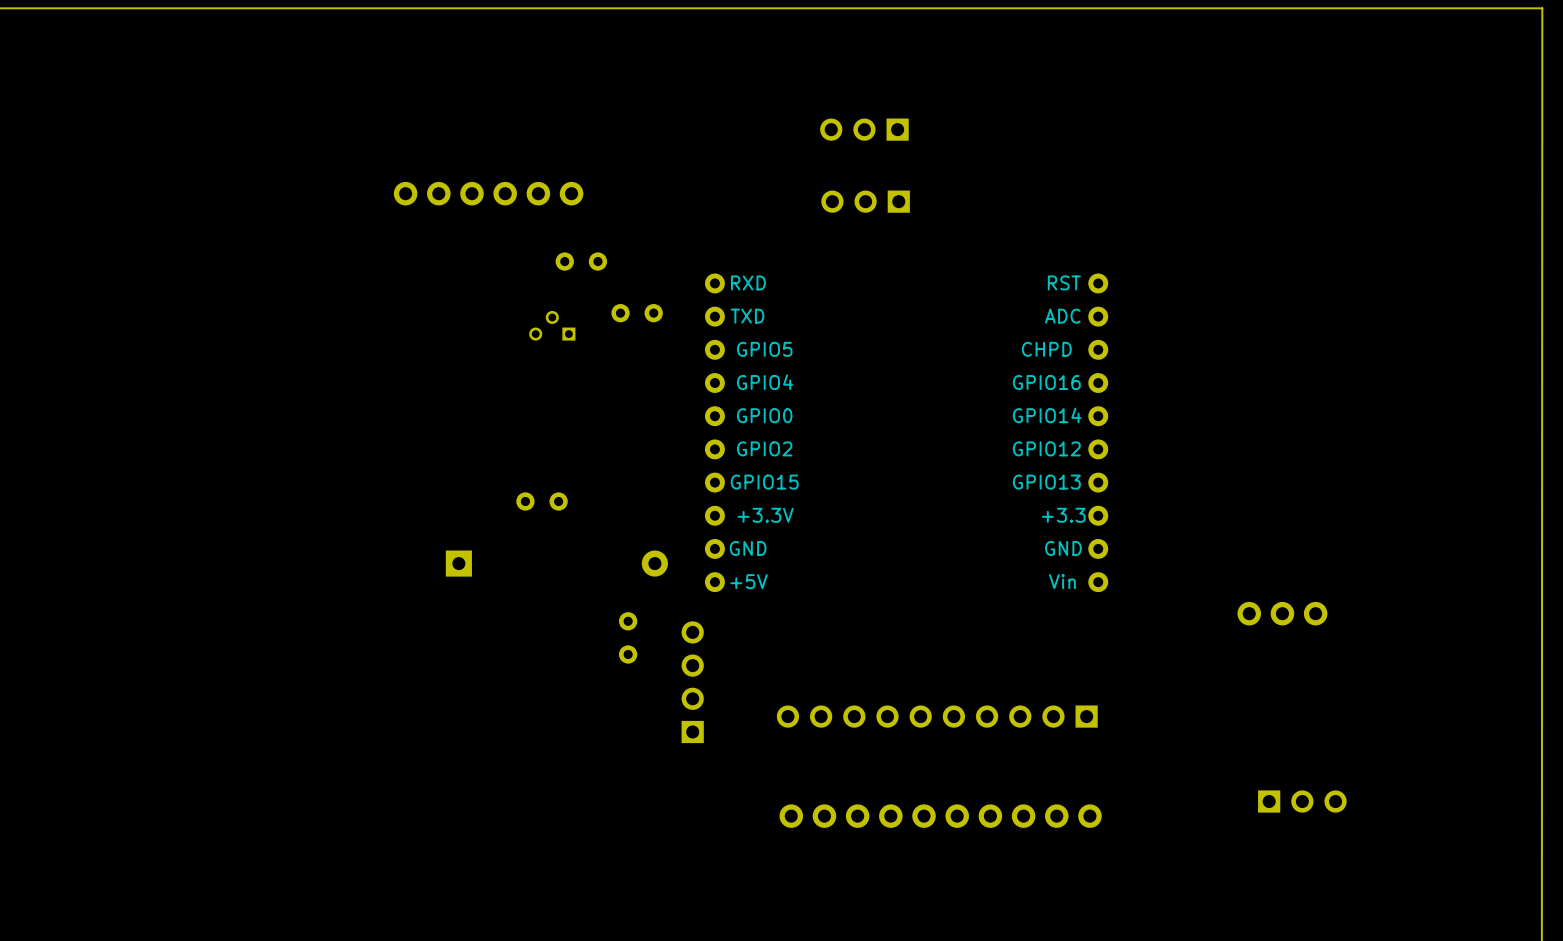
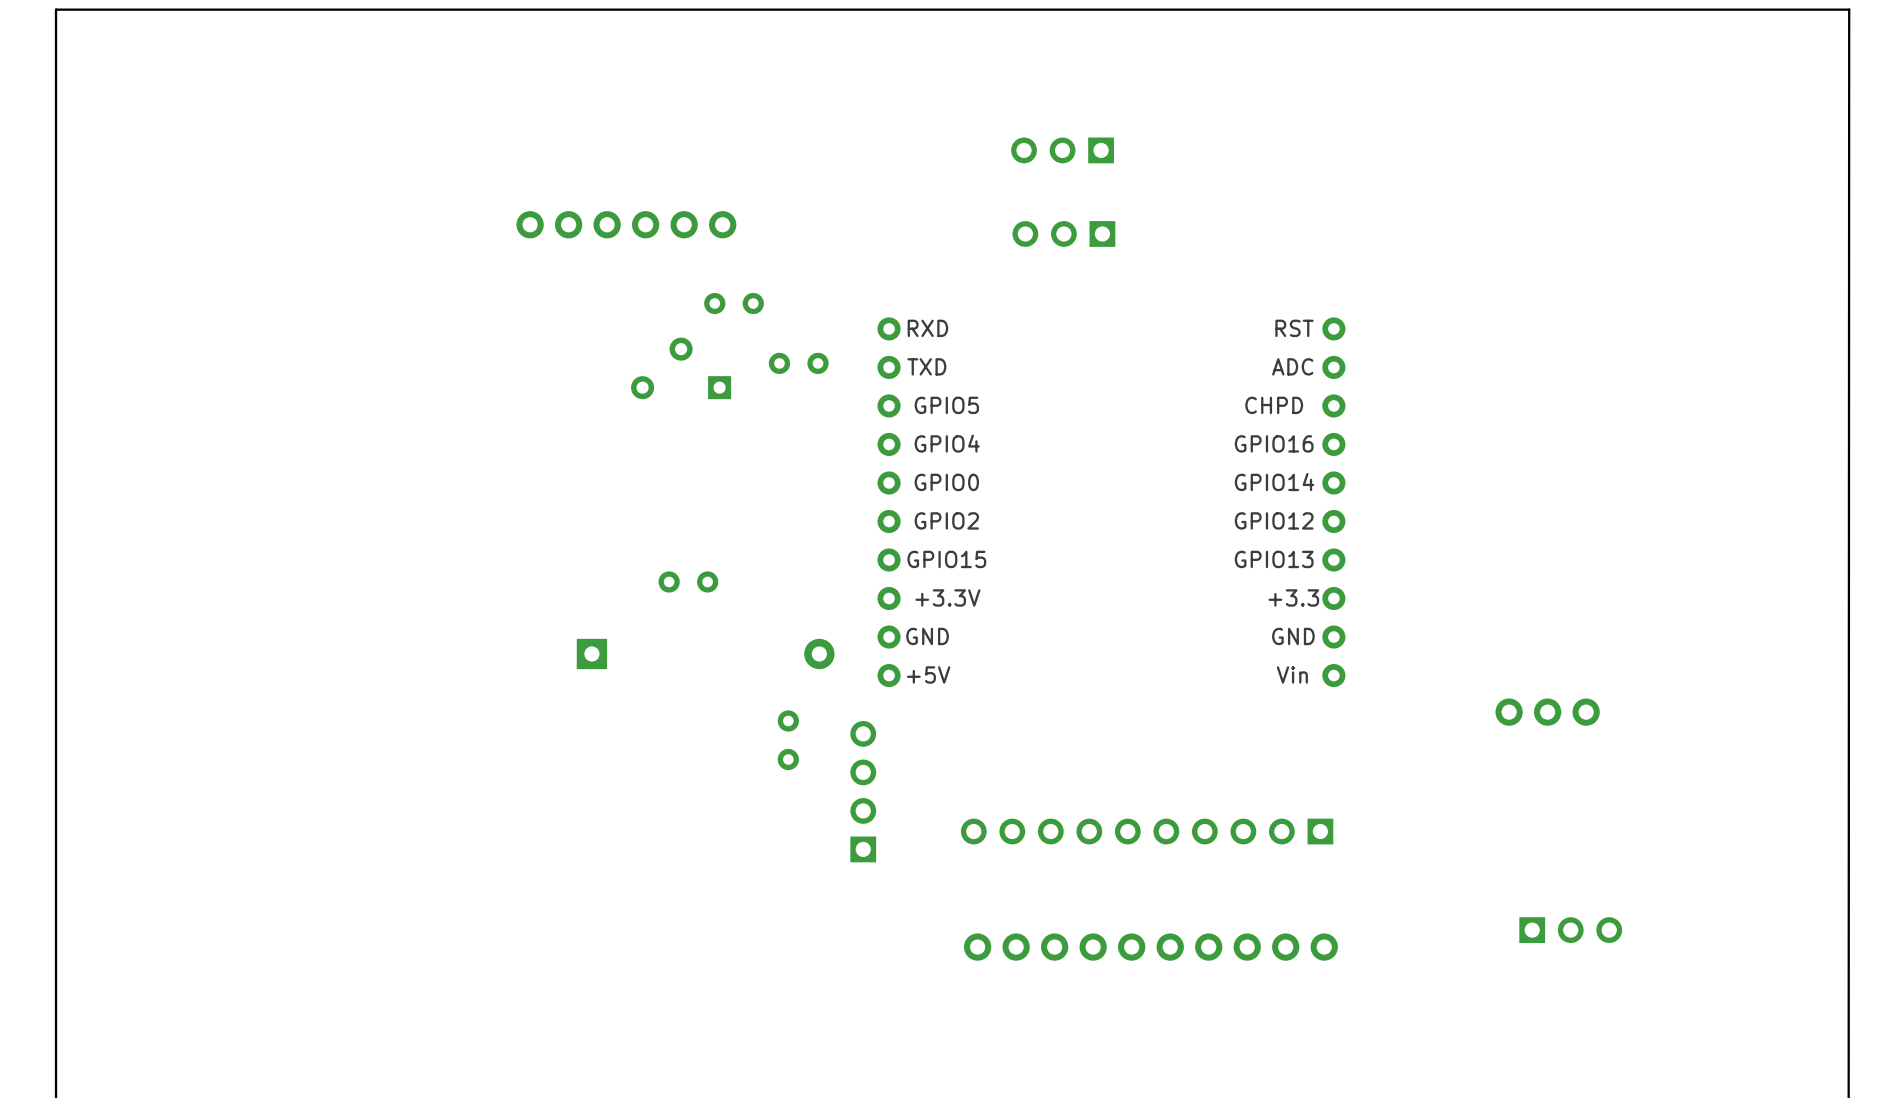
part: none -> (681, 368)
part: (552, 325) -> none

